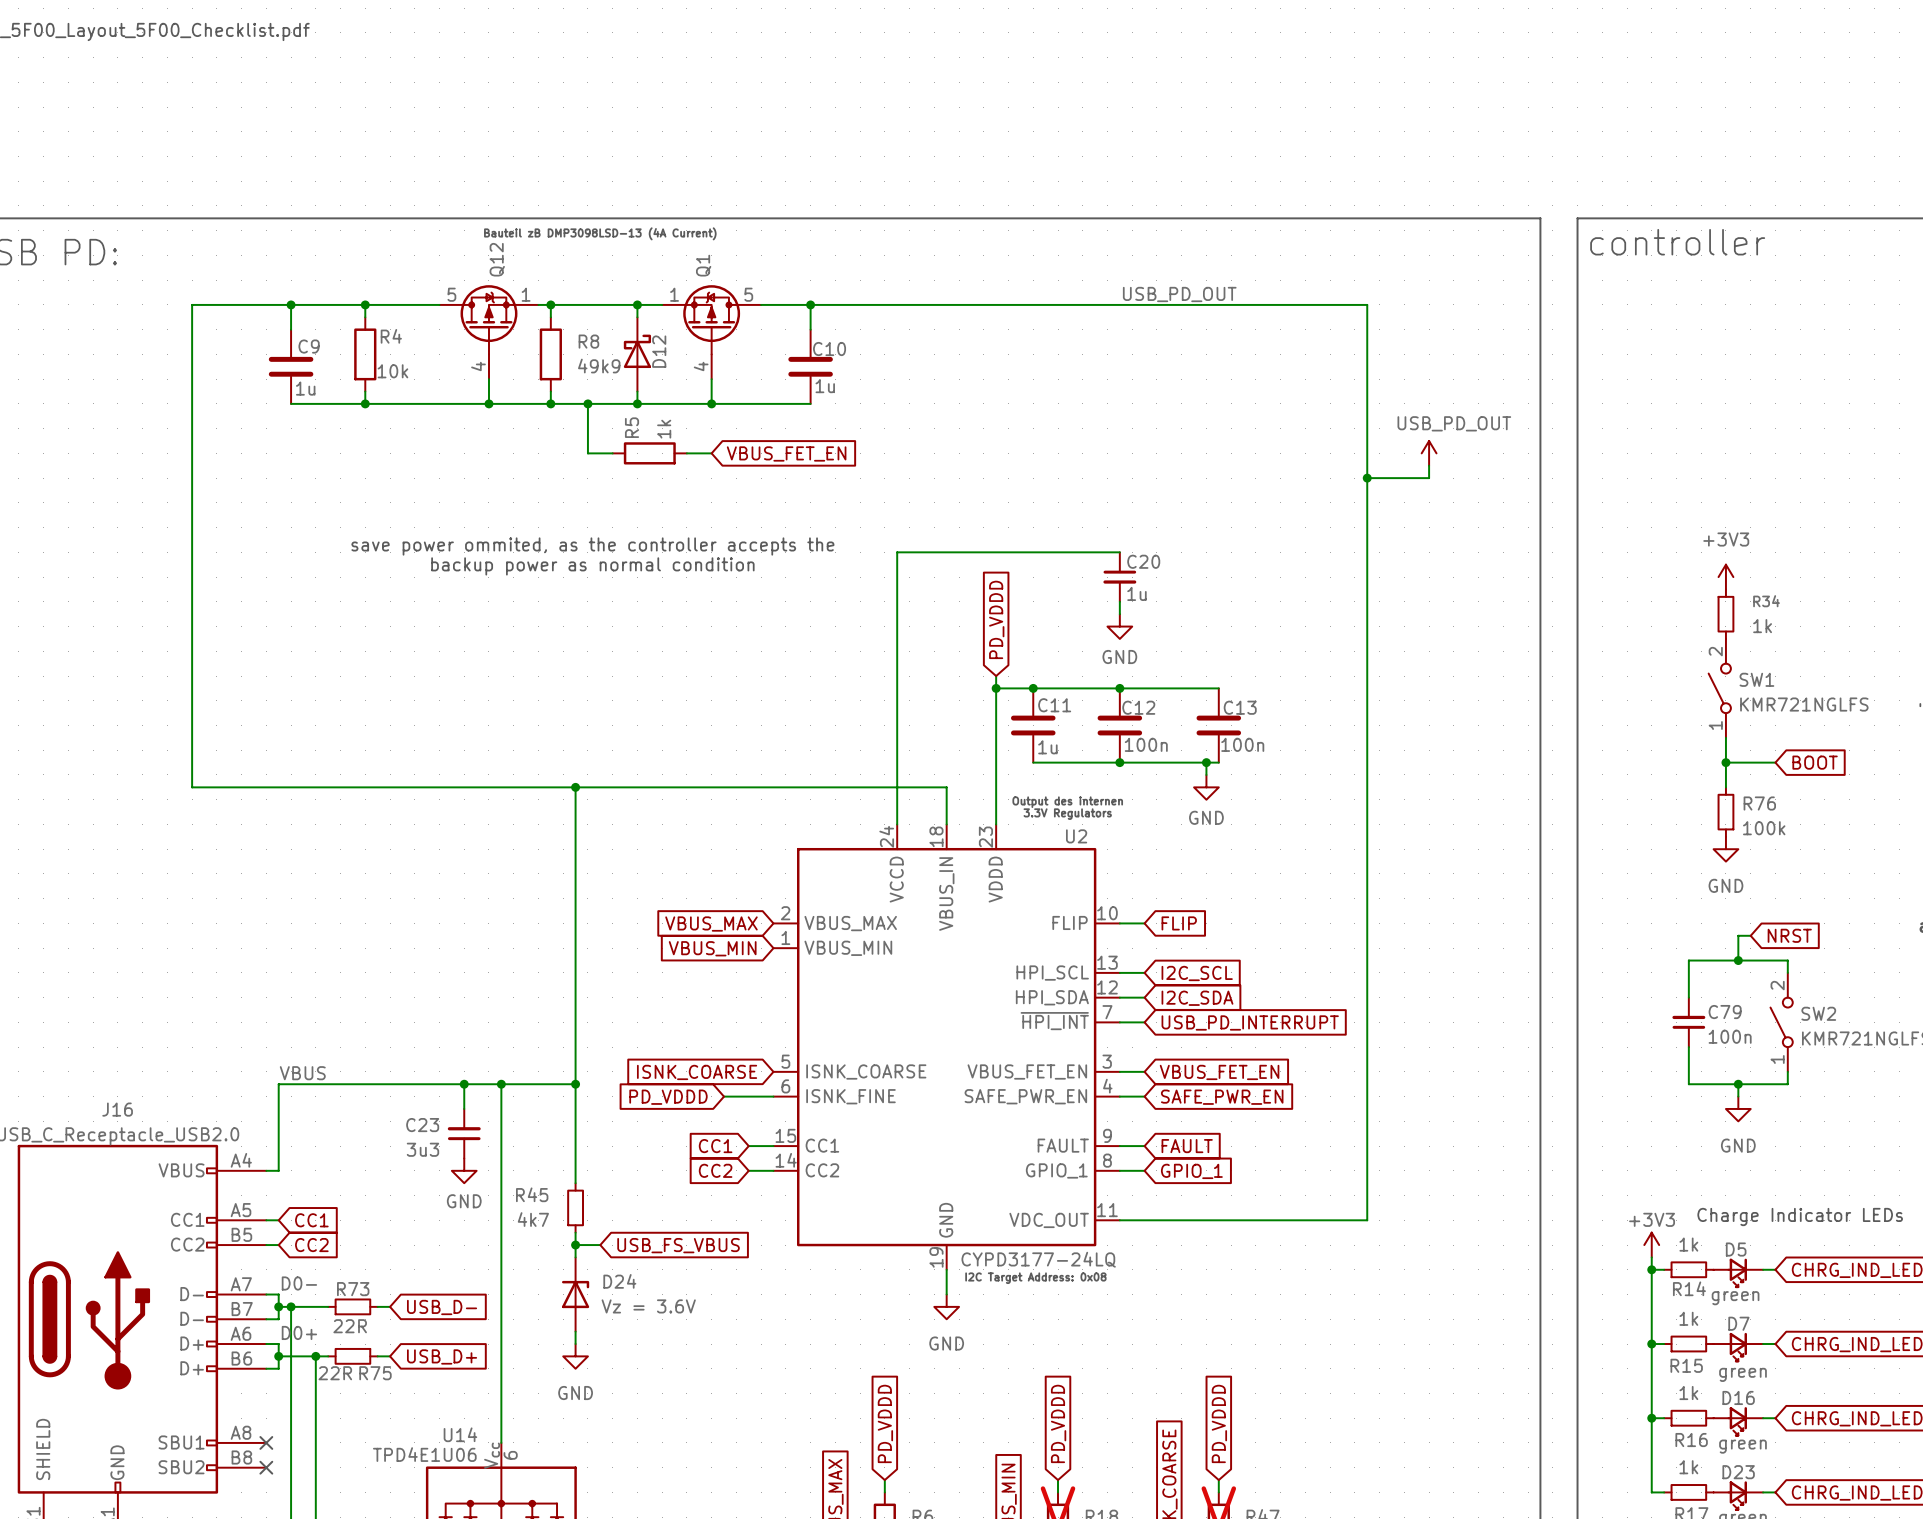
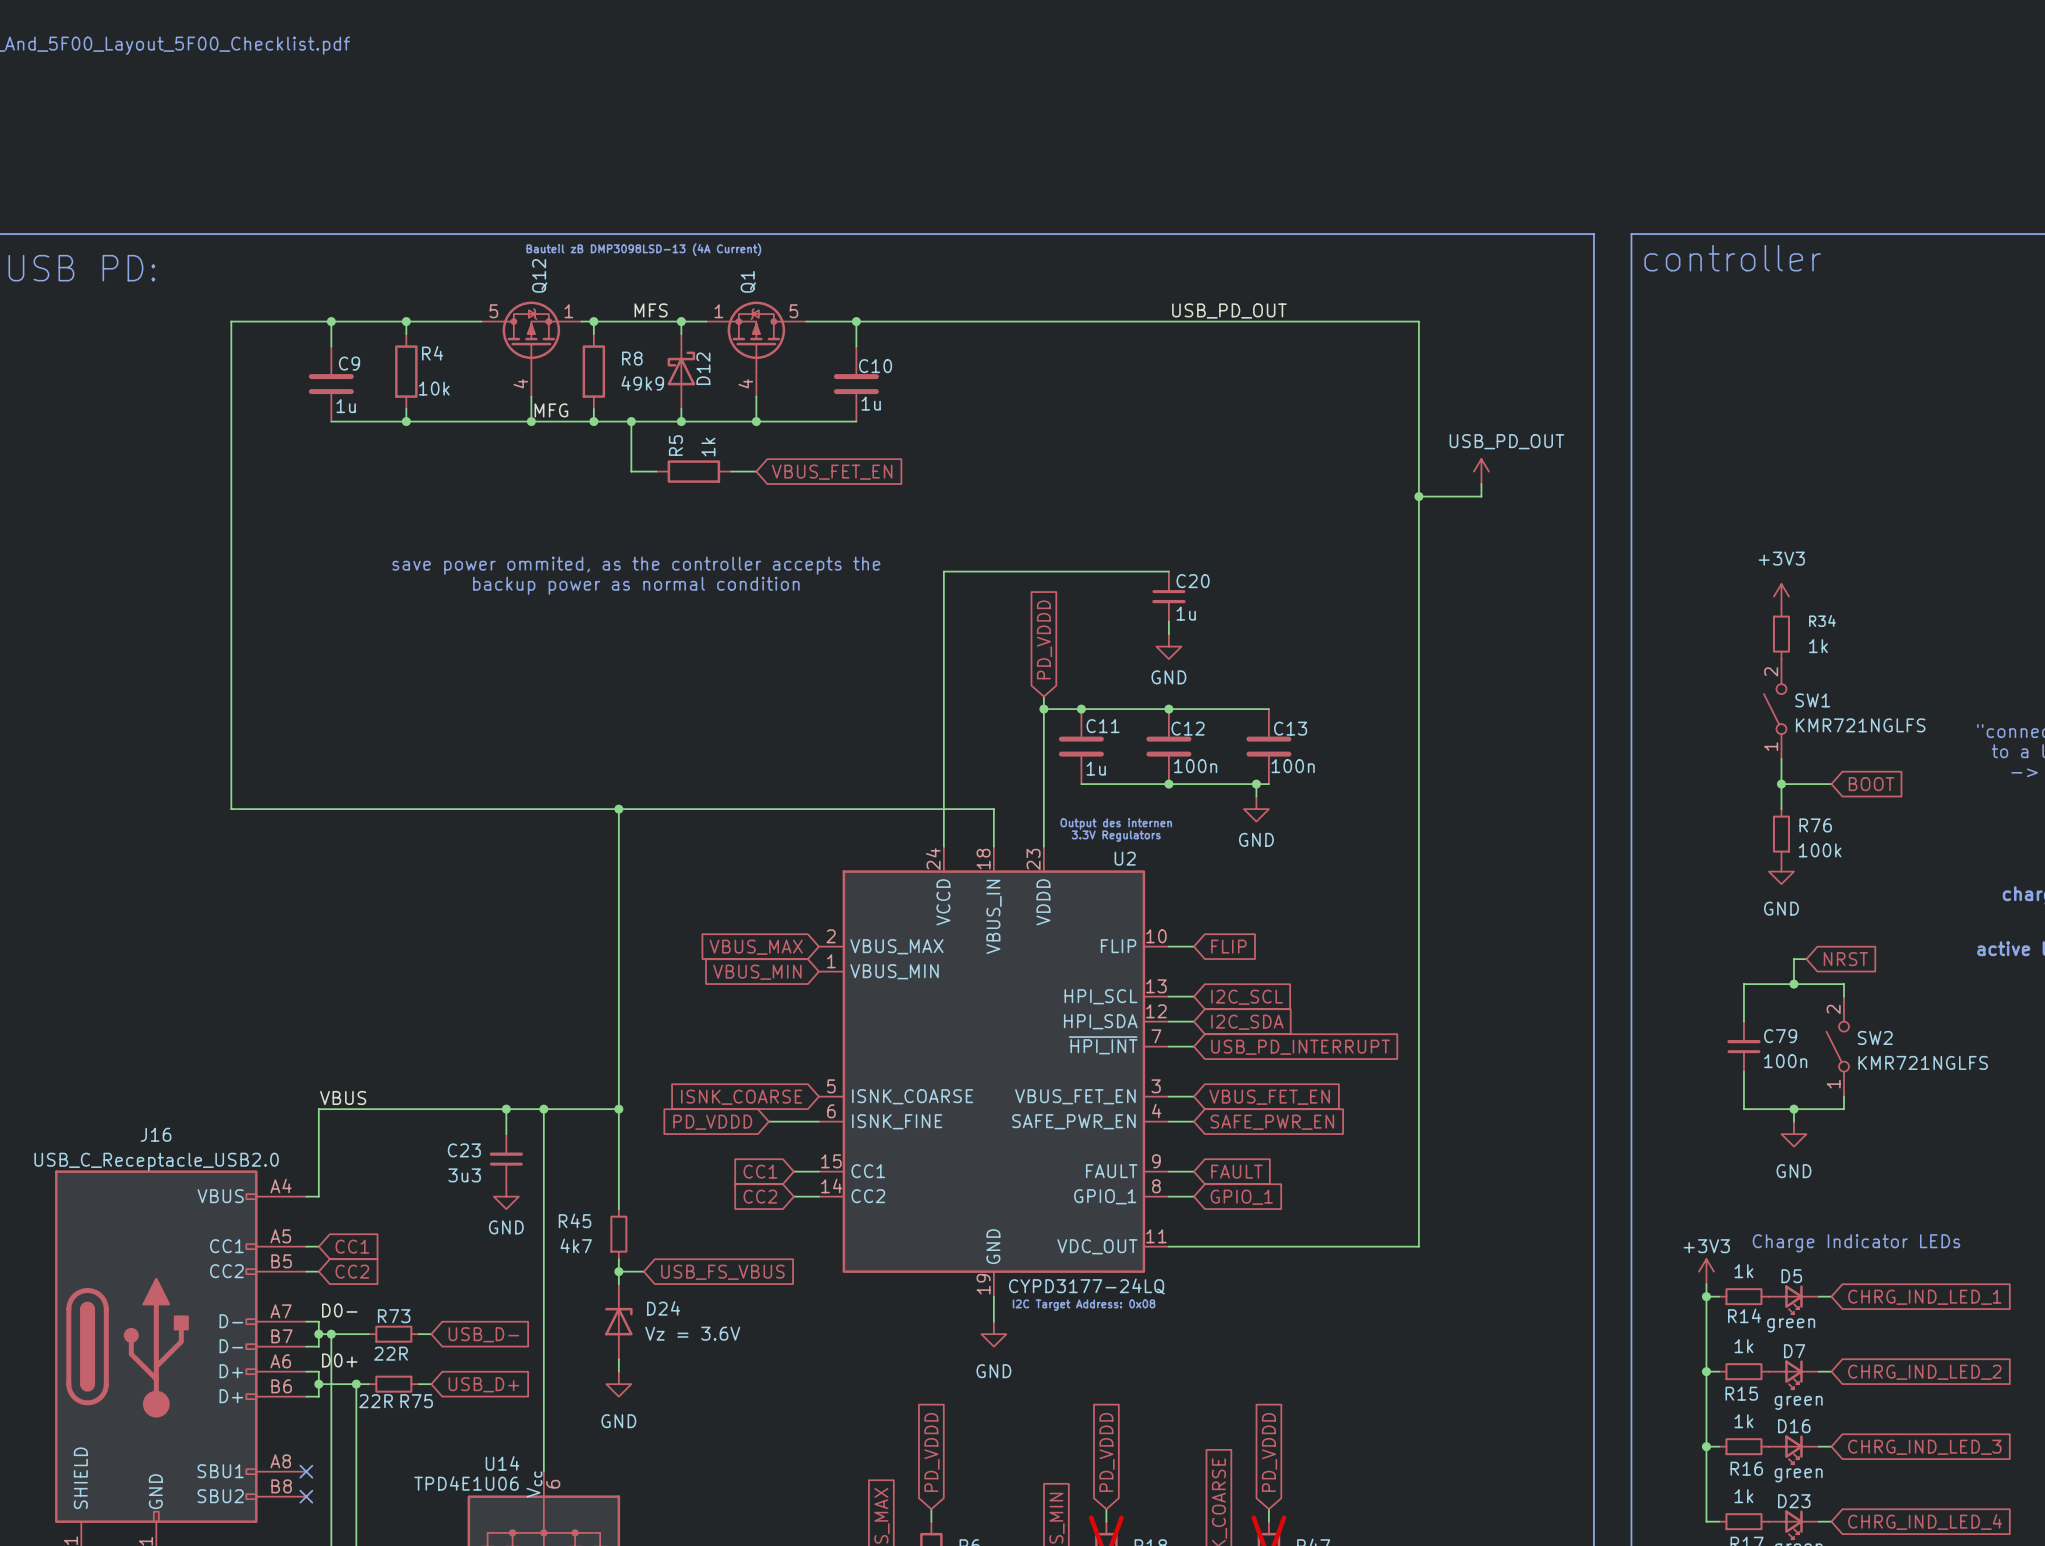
label: none -> MFS (651, 310)
label: none -> MFG (551, 410)

